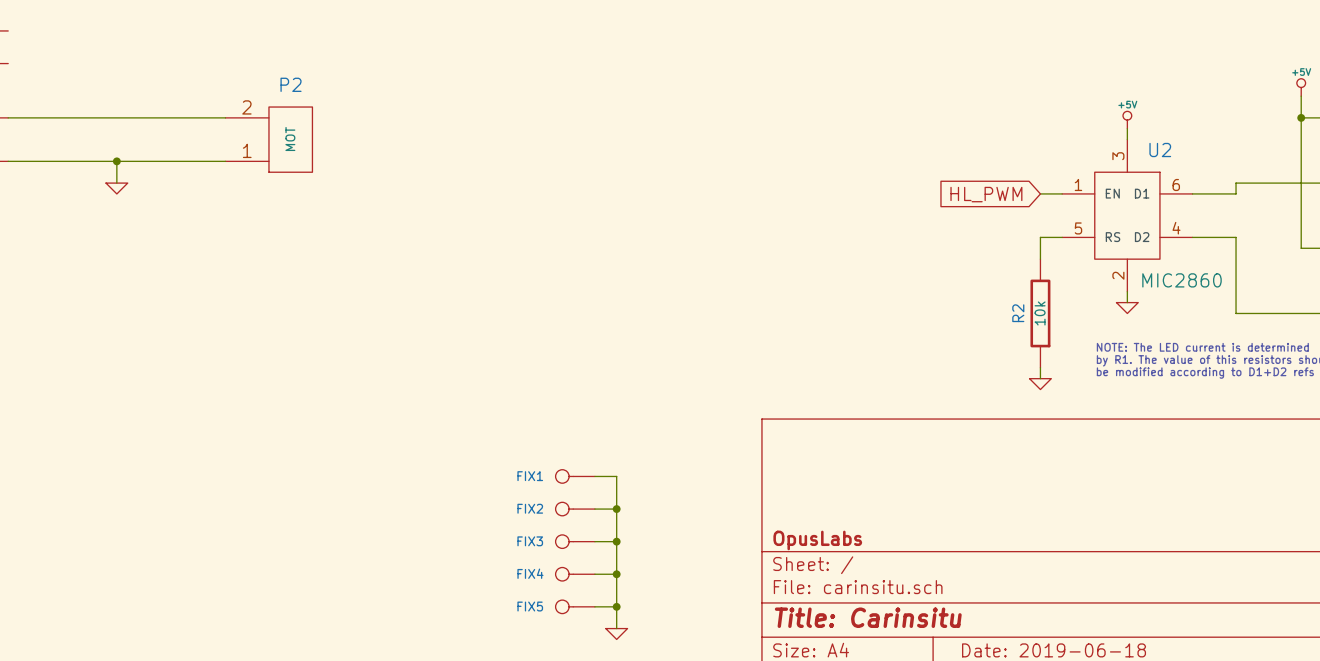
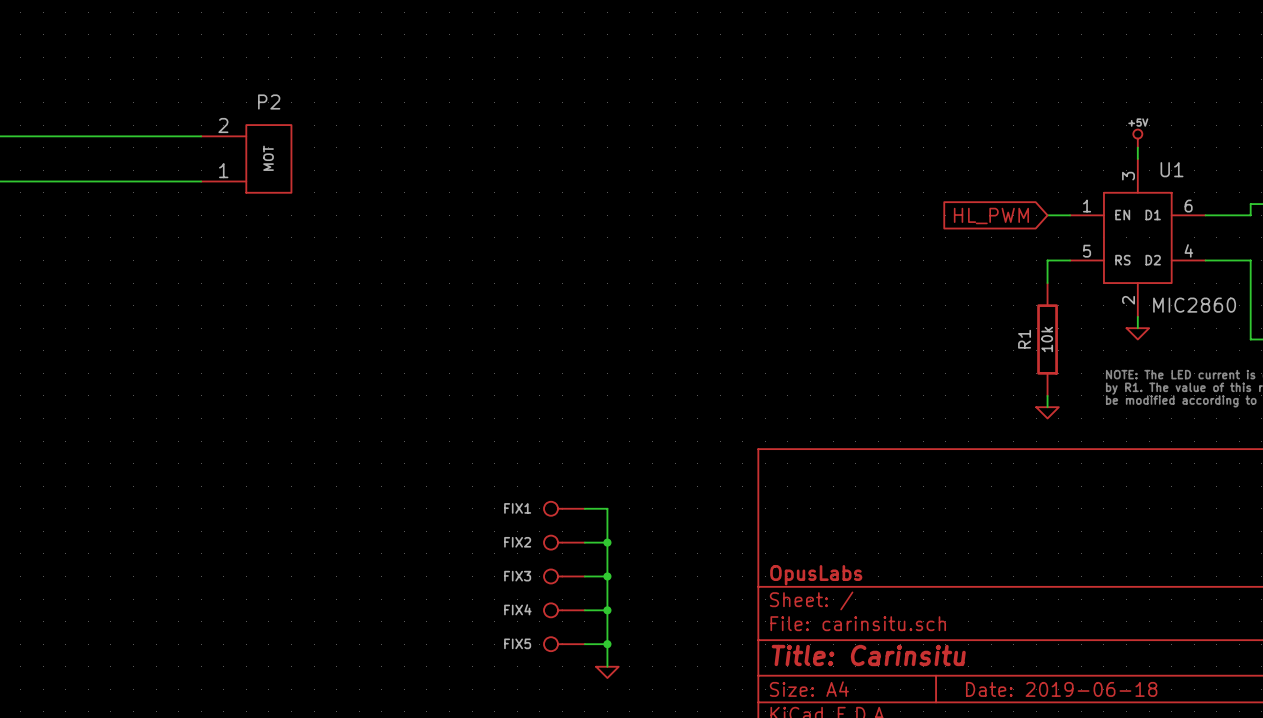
U2 name: U2 (1160, 150) -> U1 (1172, 169)
wire: (116, 161) (116, 183) -> none
junction: (116, 161) -> none
power symbol: (116, 188) -> none
R2 name: R2 (1018, 313) -> R1 (1024, 339)

